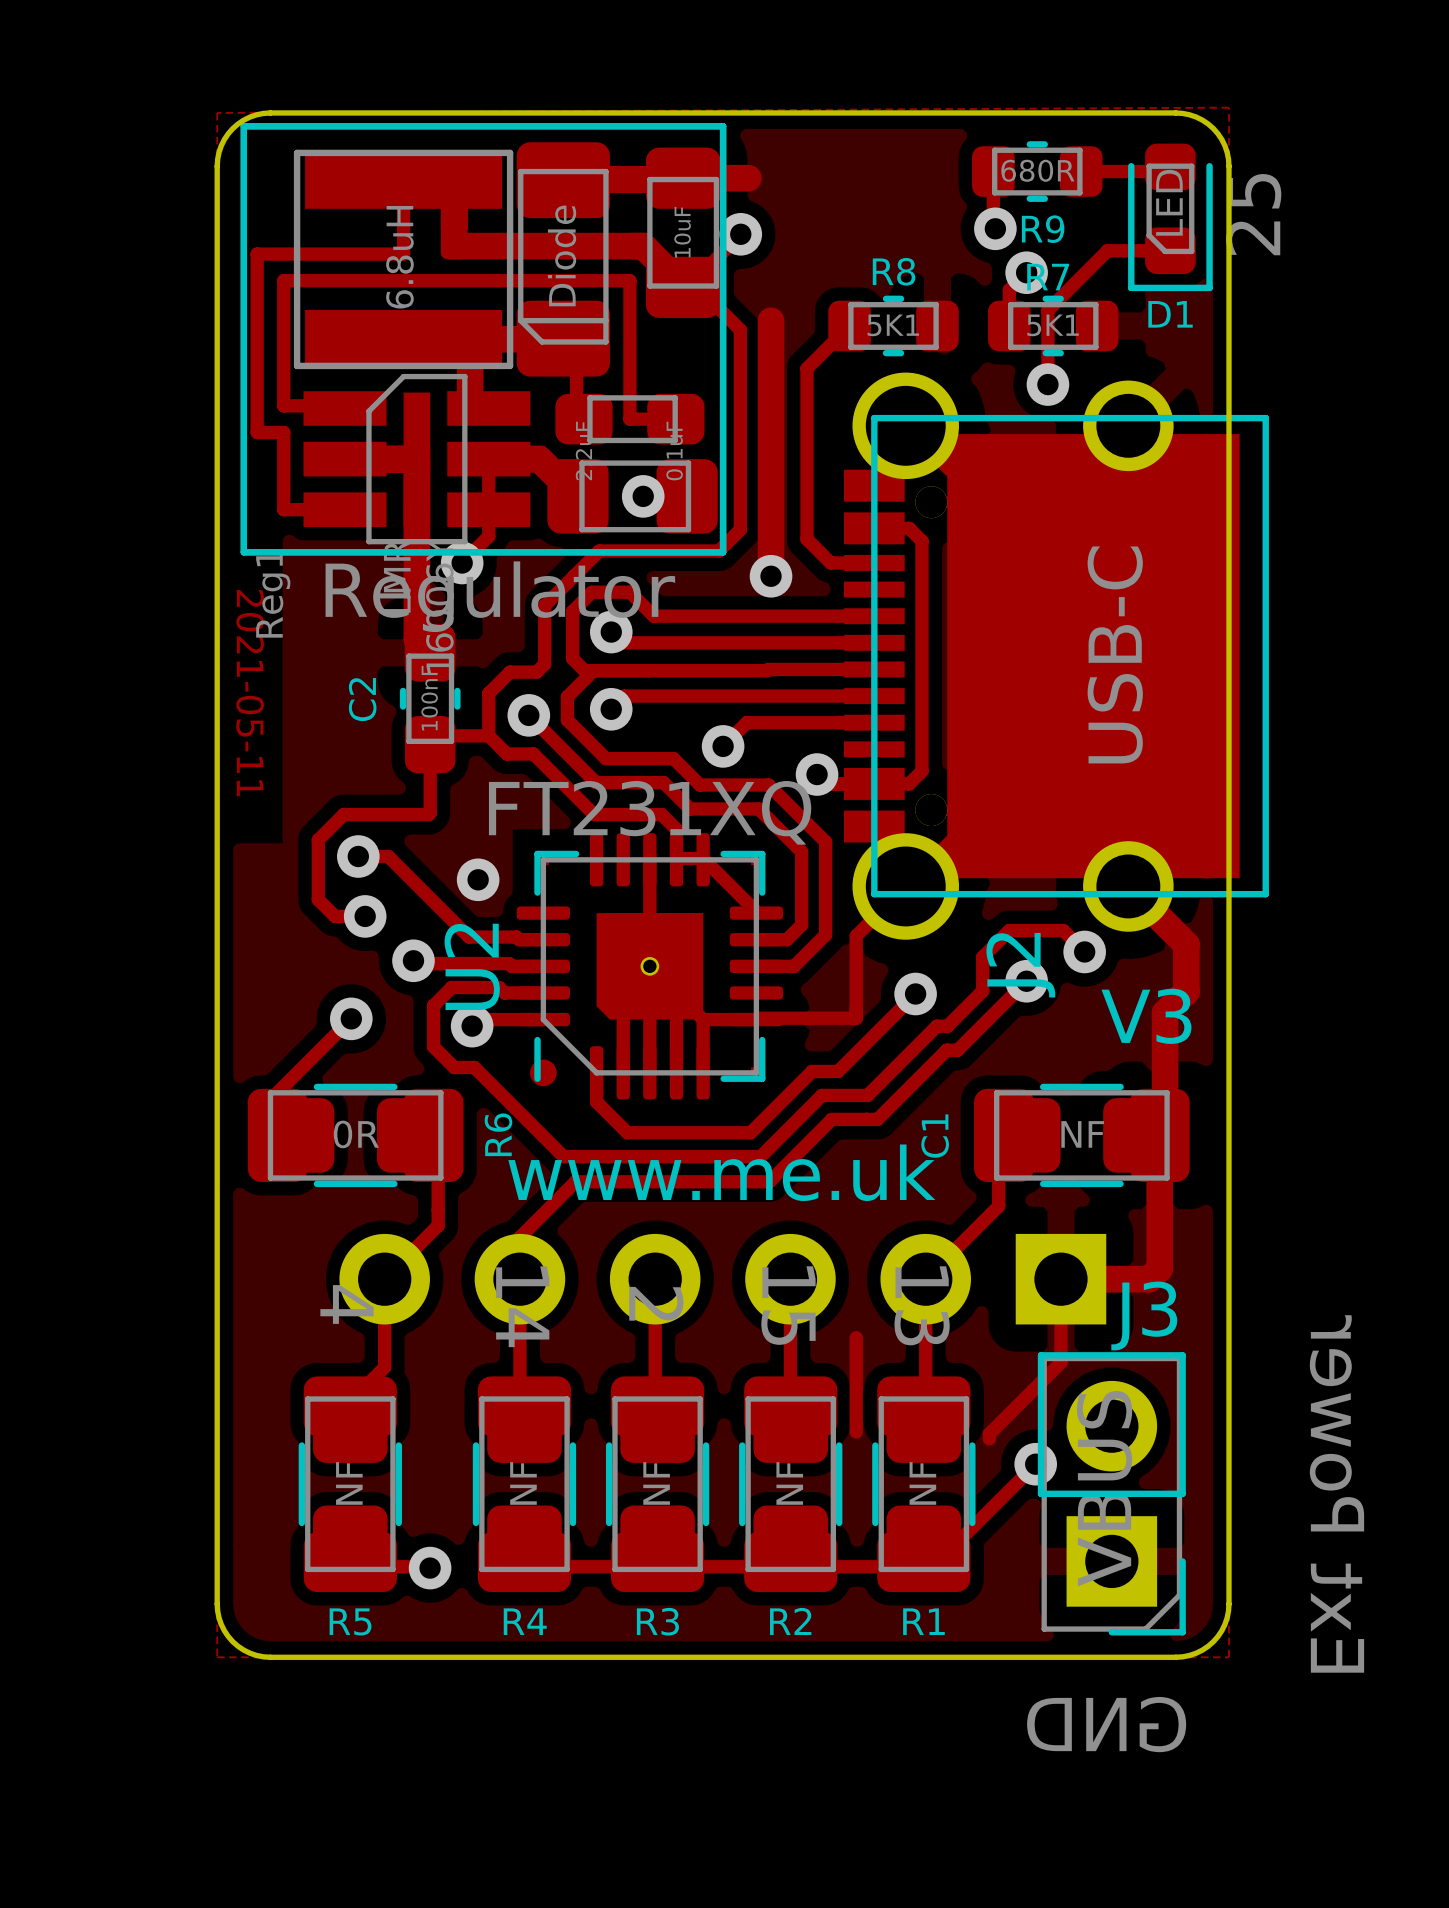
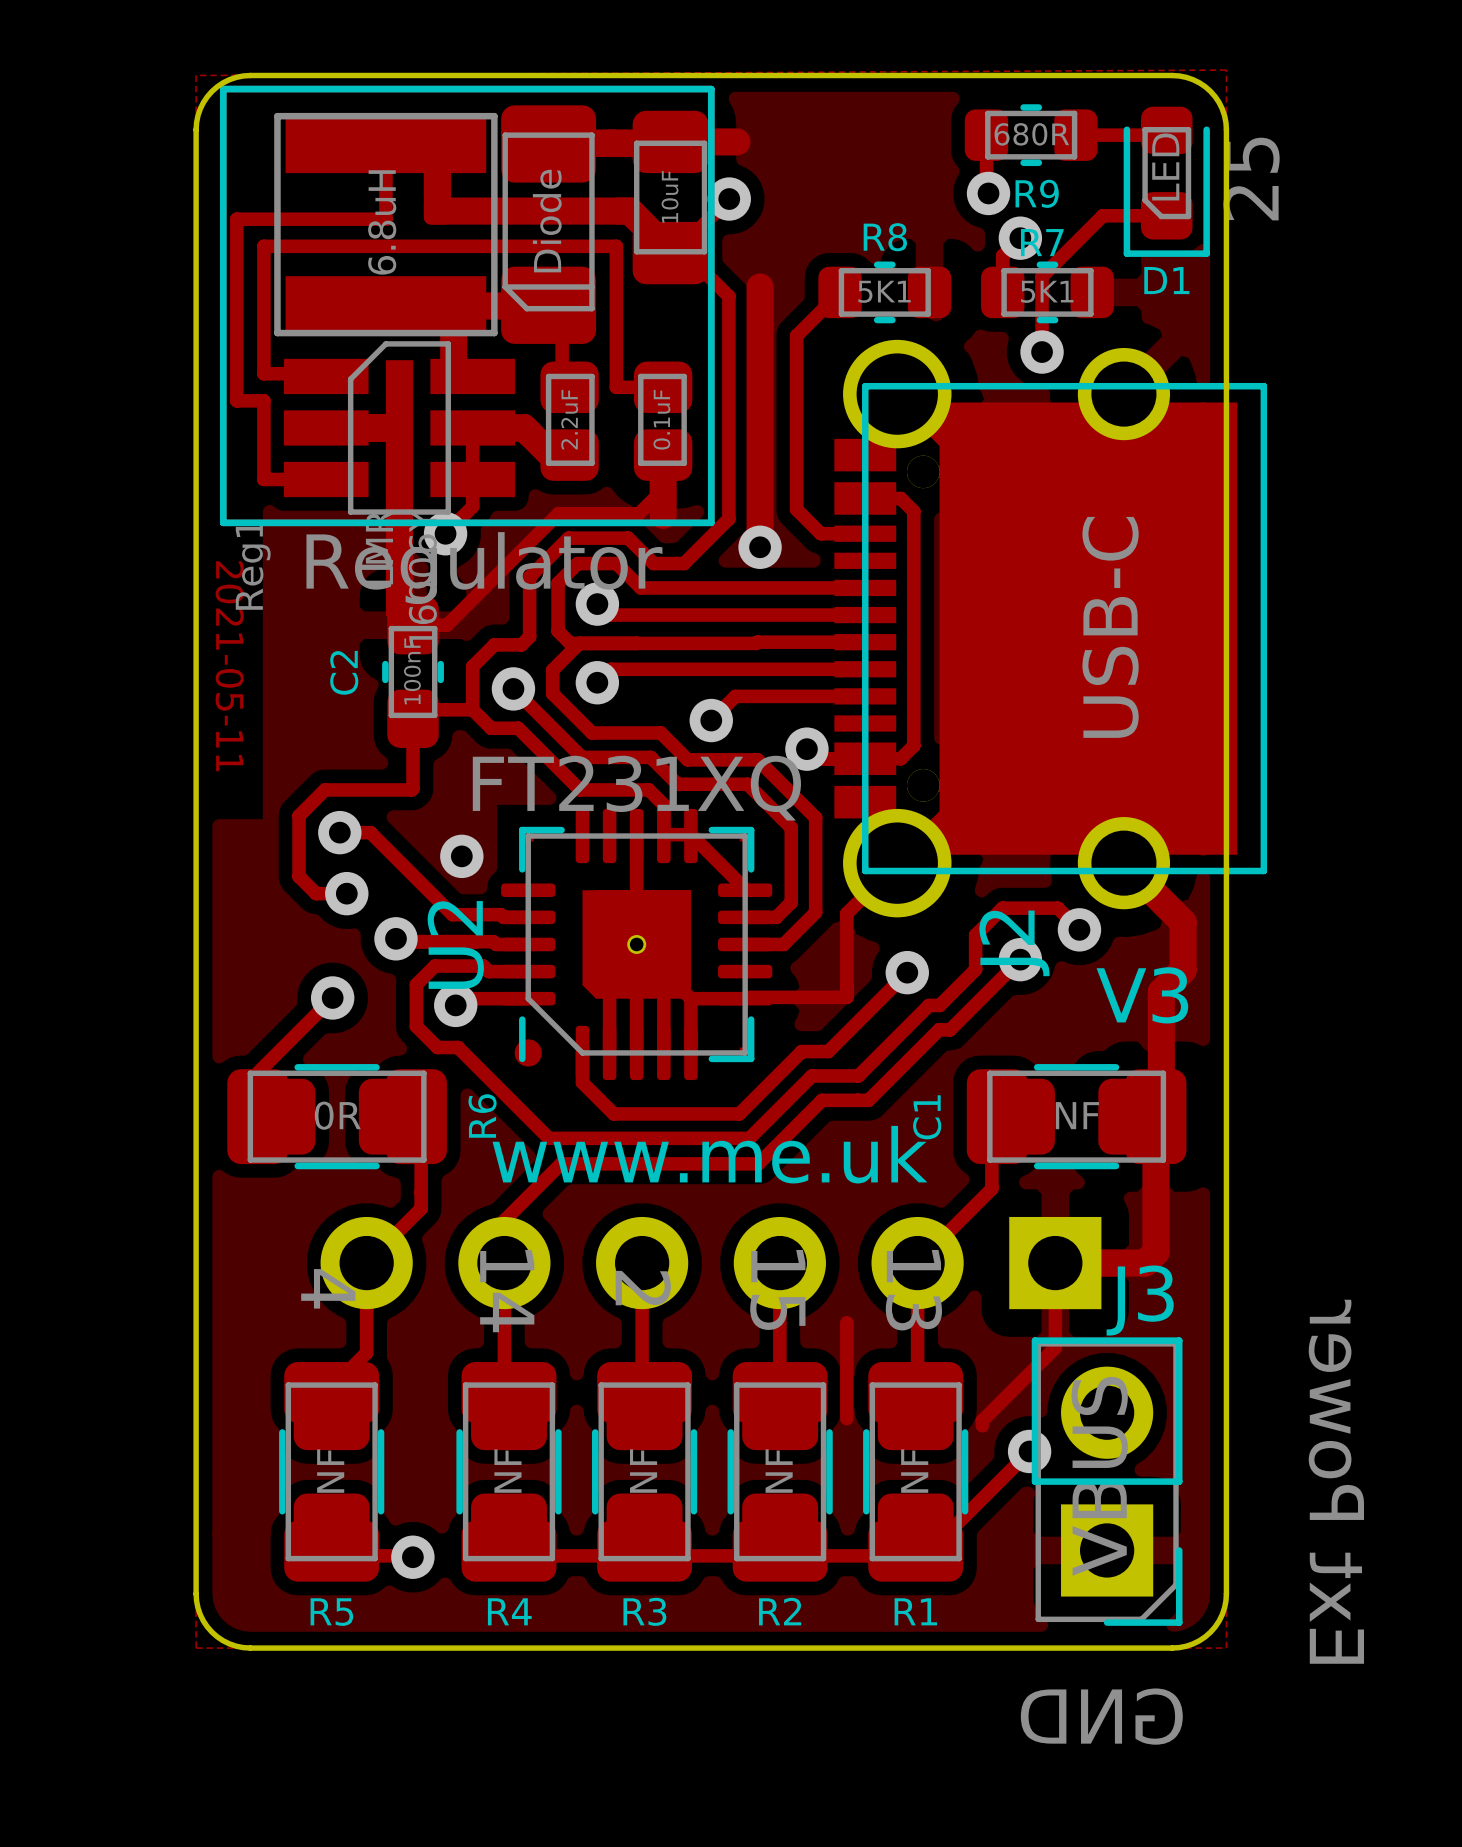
Reg1 footprint: [240, 123, 727, 556] -> [219, 85, 715, 527]
via: (643, 496) -> none
track: (740, 529) (719, 550) (599, 550) (582, 567) -> (728, 499) (728, 518) (684, 563) (653, 563) (628, 538) (568, 538)
track: none -> (663, 515) (663, 455) (663, 489) (639, 513) (558, 513) (446, 625) (413, 625)

